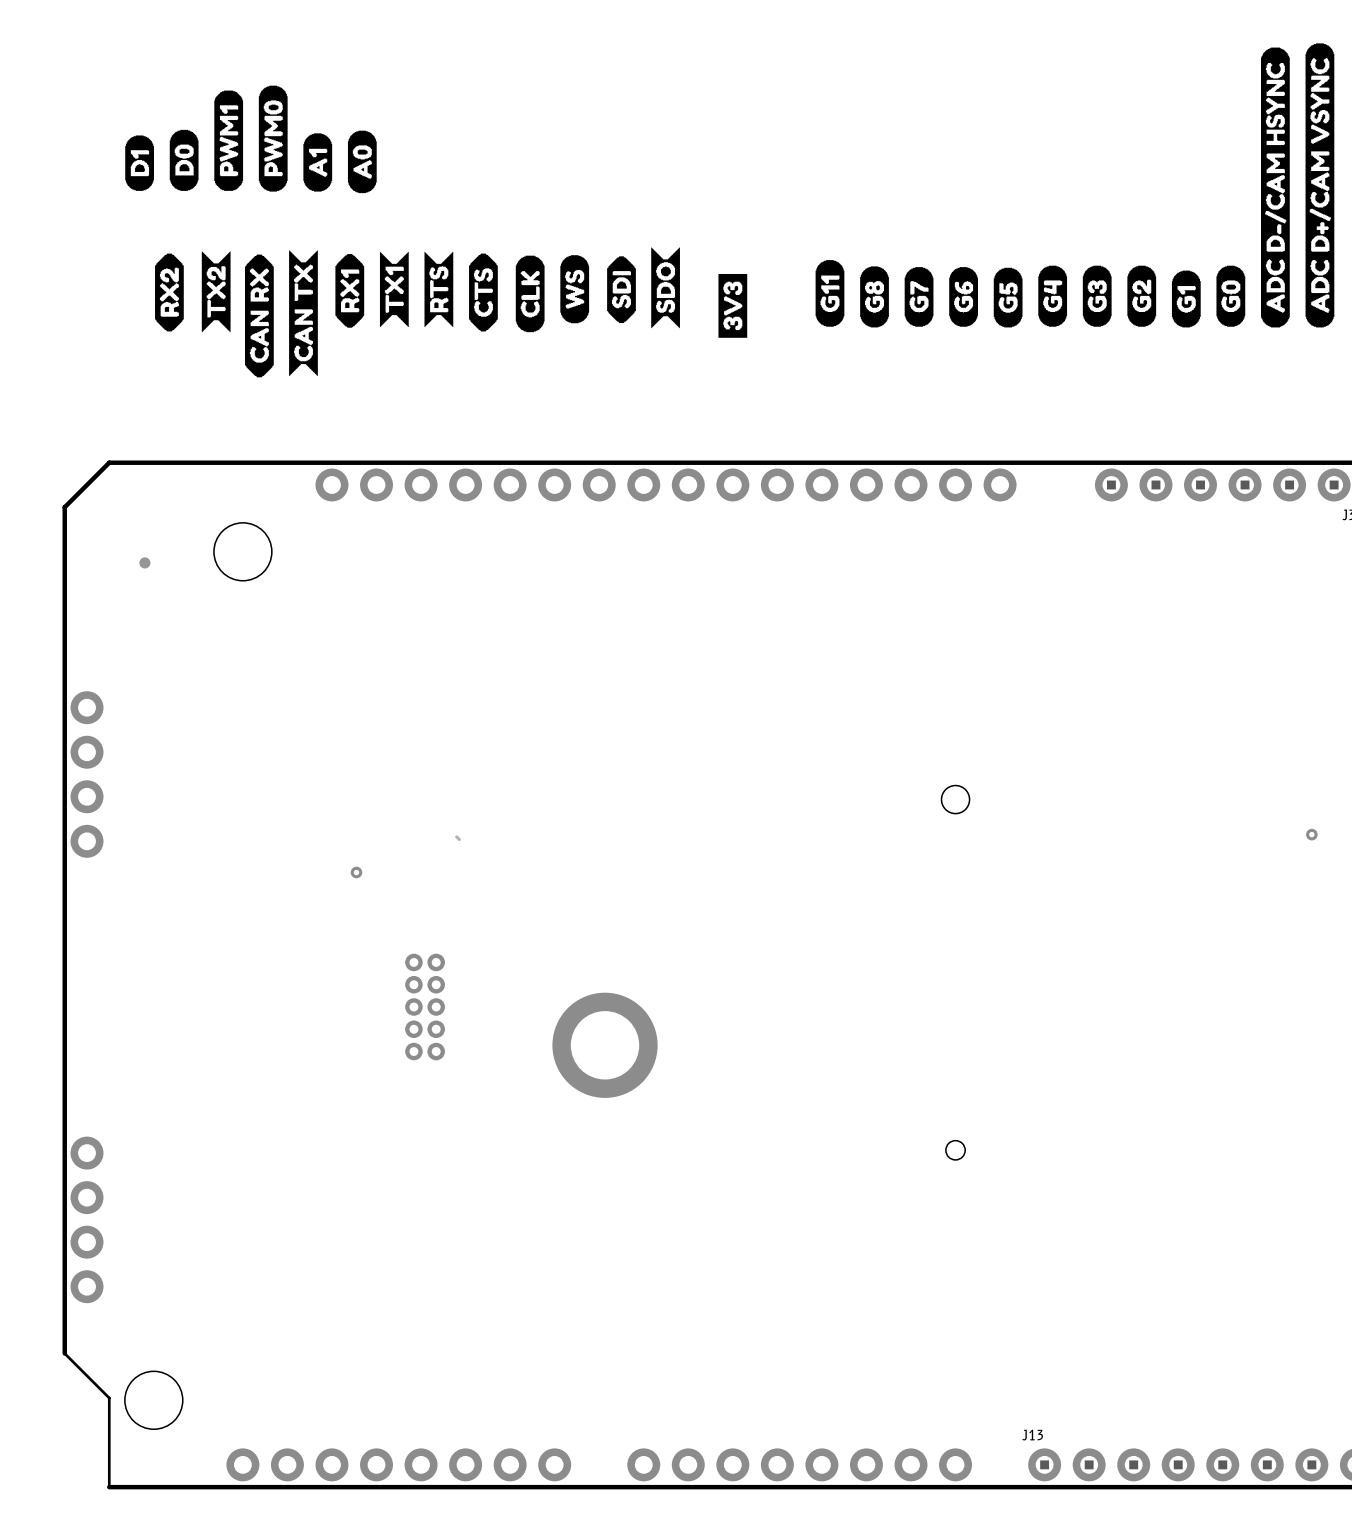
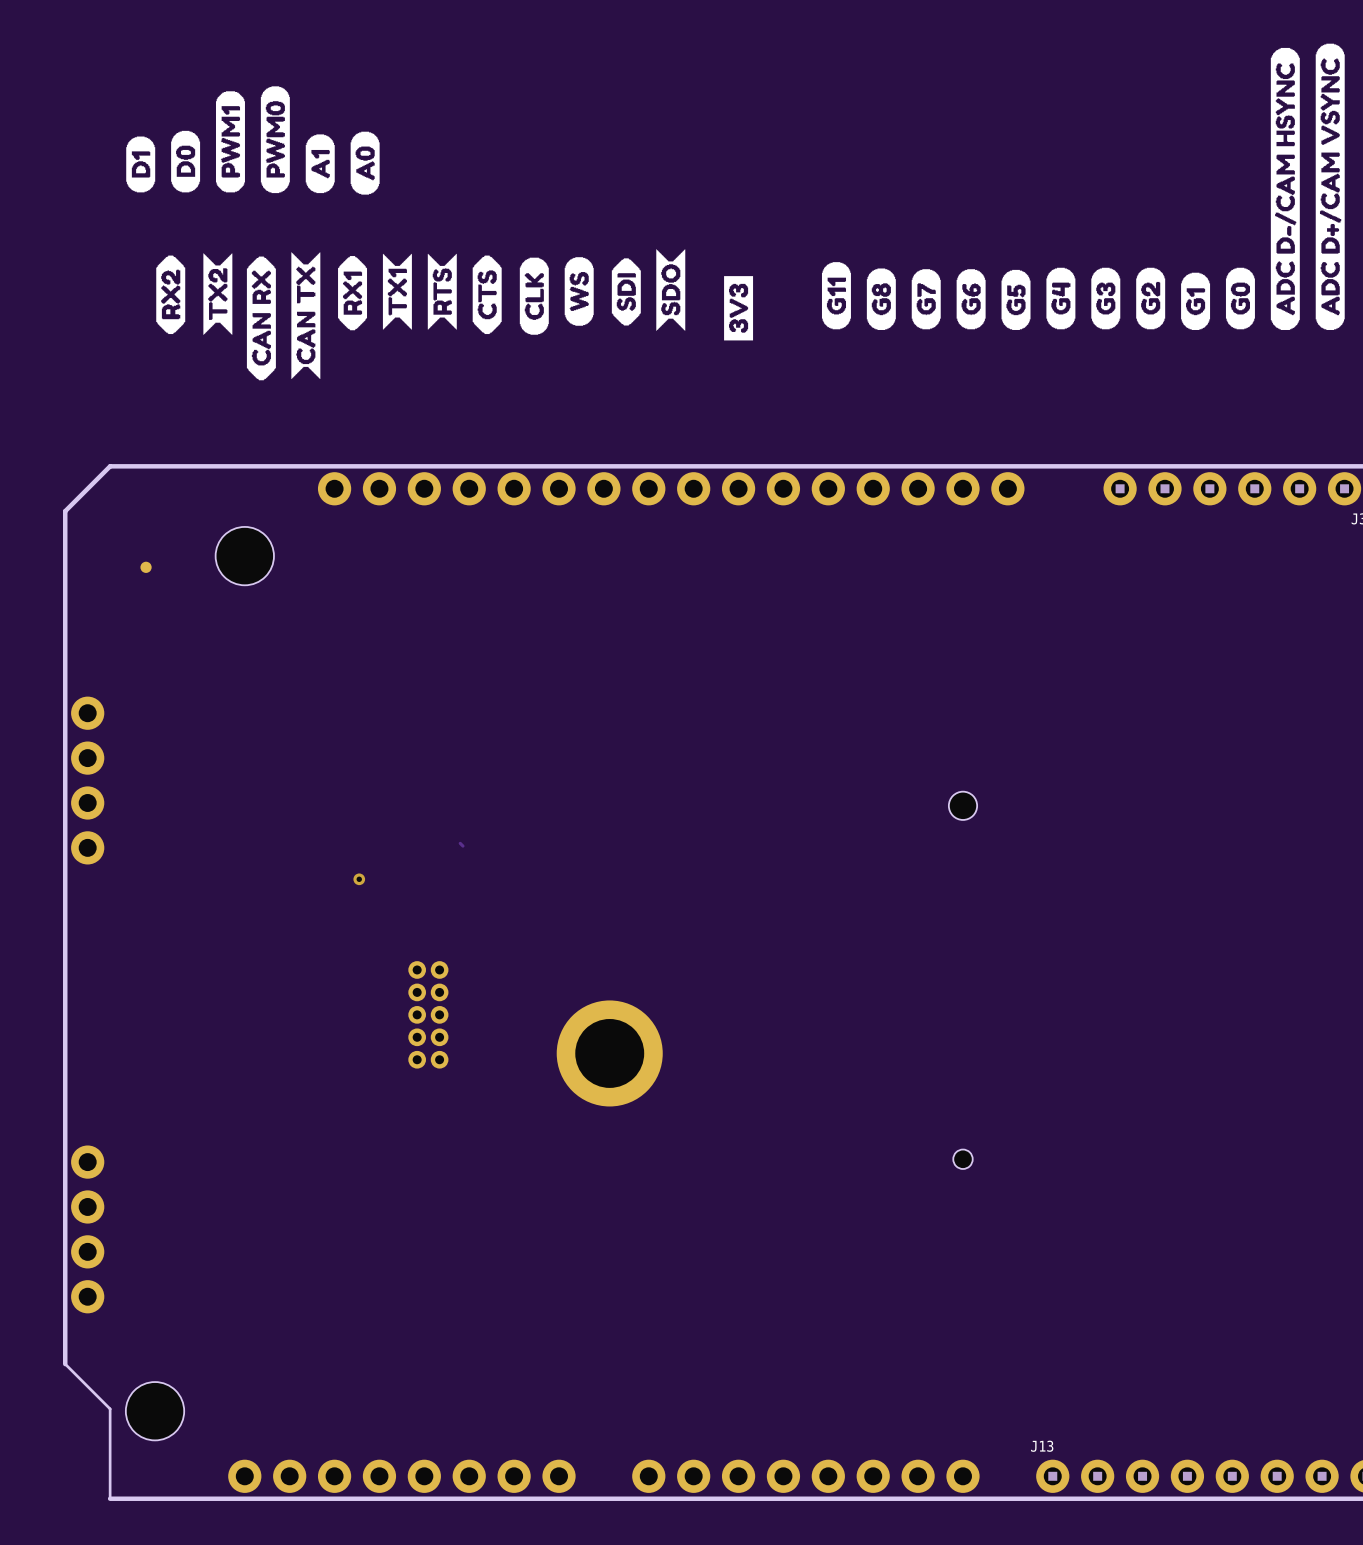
via: (1311, 834) -> none

